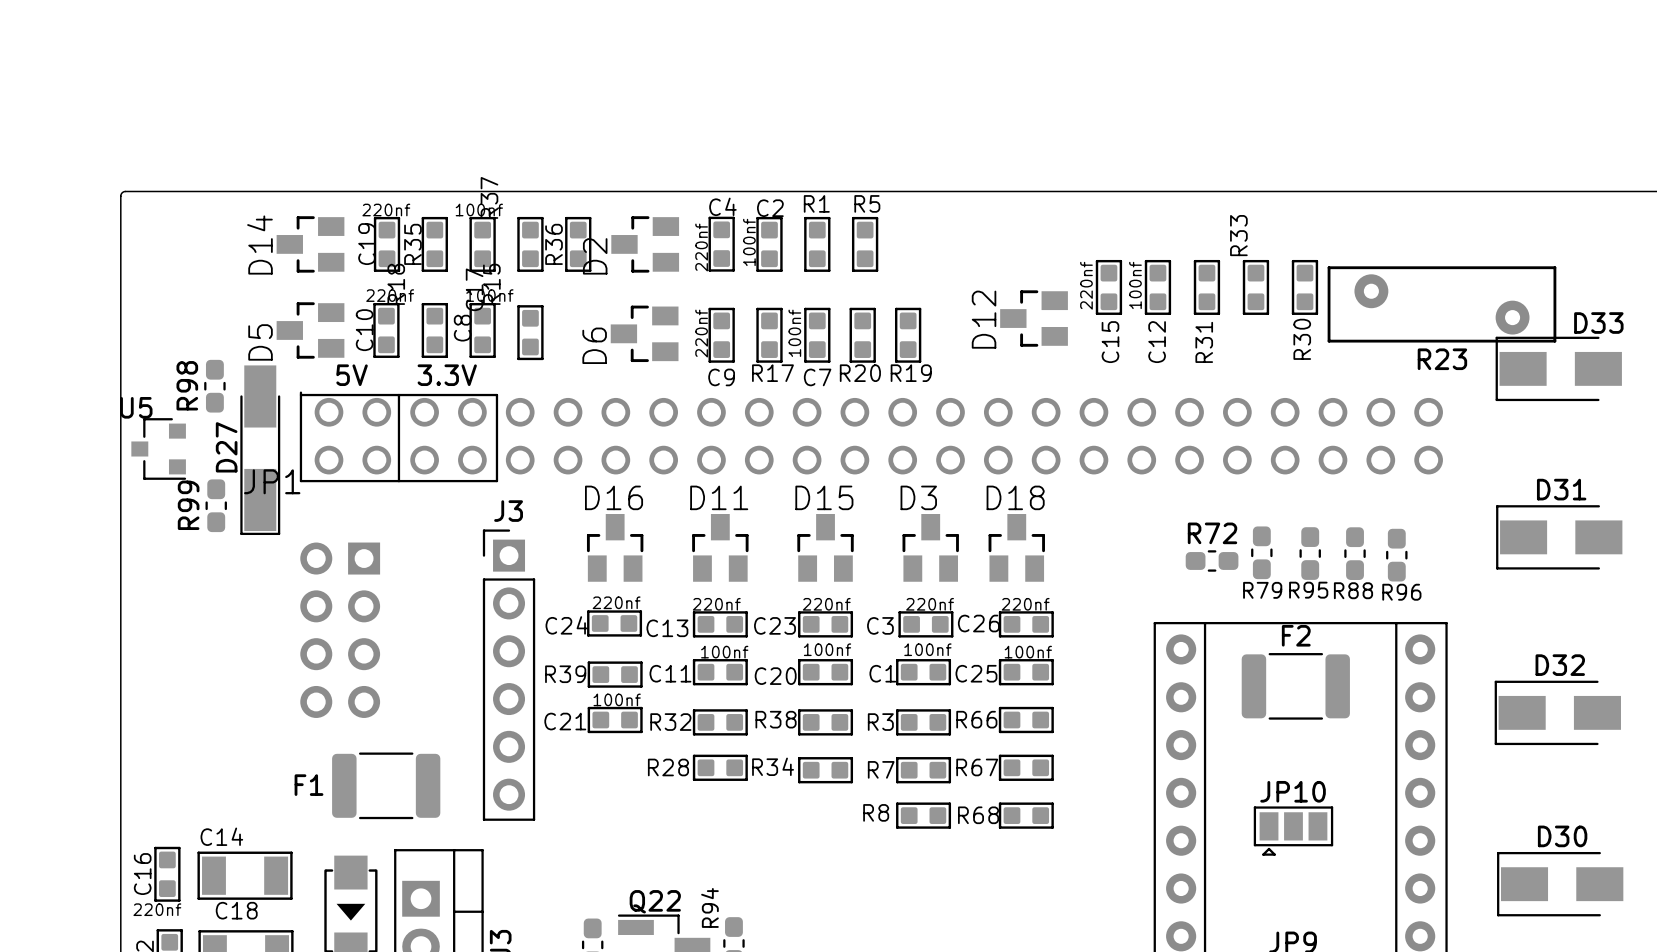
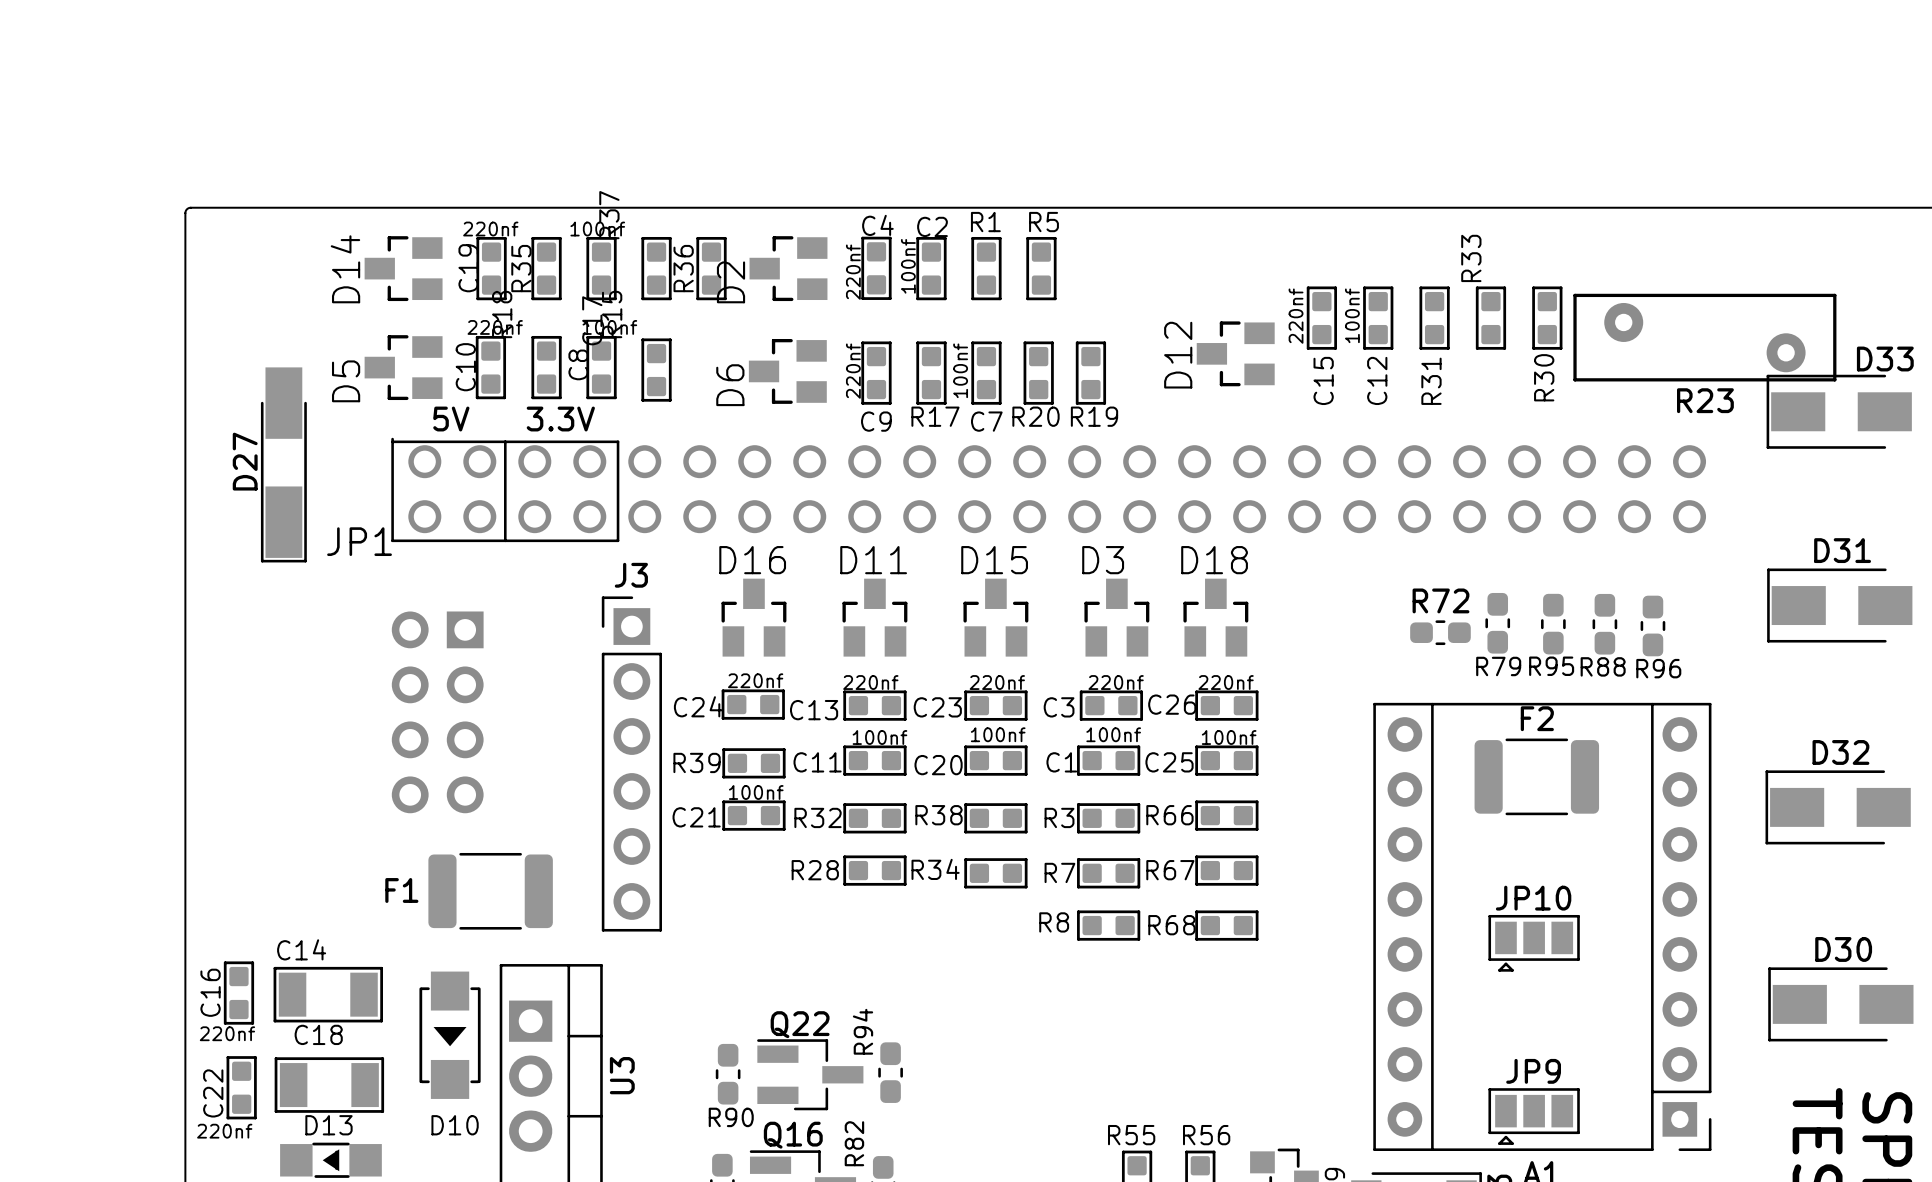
R98: (214, 386) -> none
U5: (158, 448) -> none
D27 position: (260, 450) -> (283, 464)
R99: (216, 505) -> none

